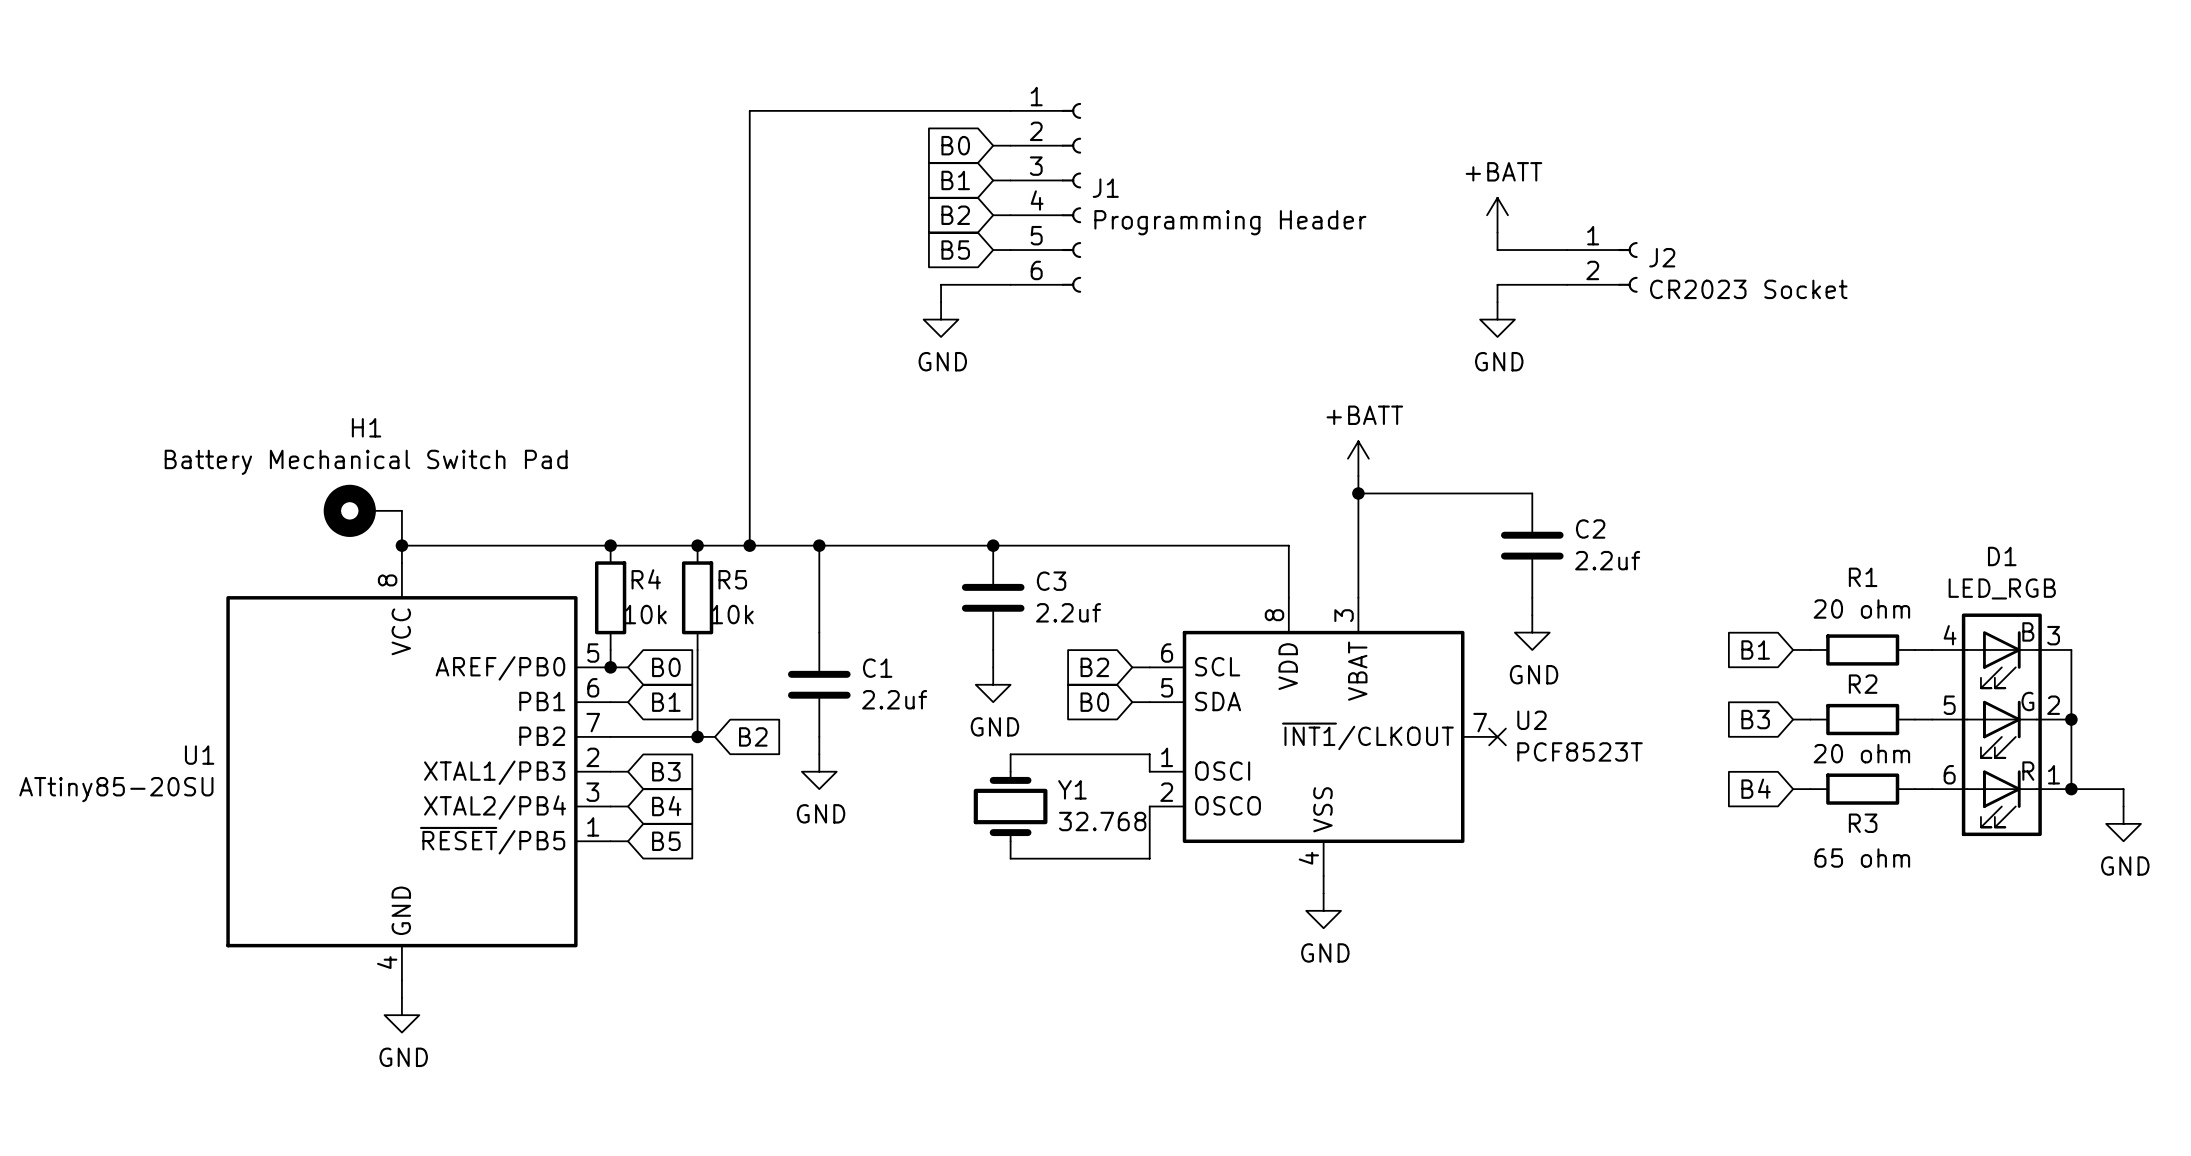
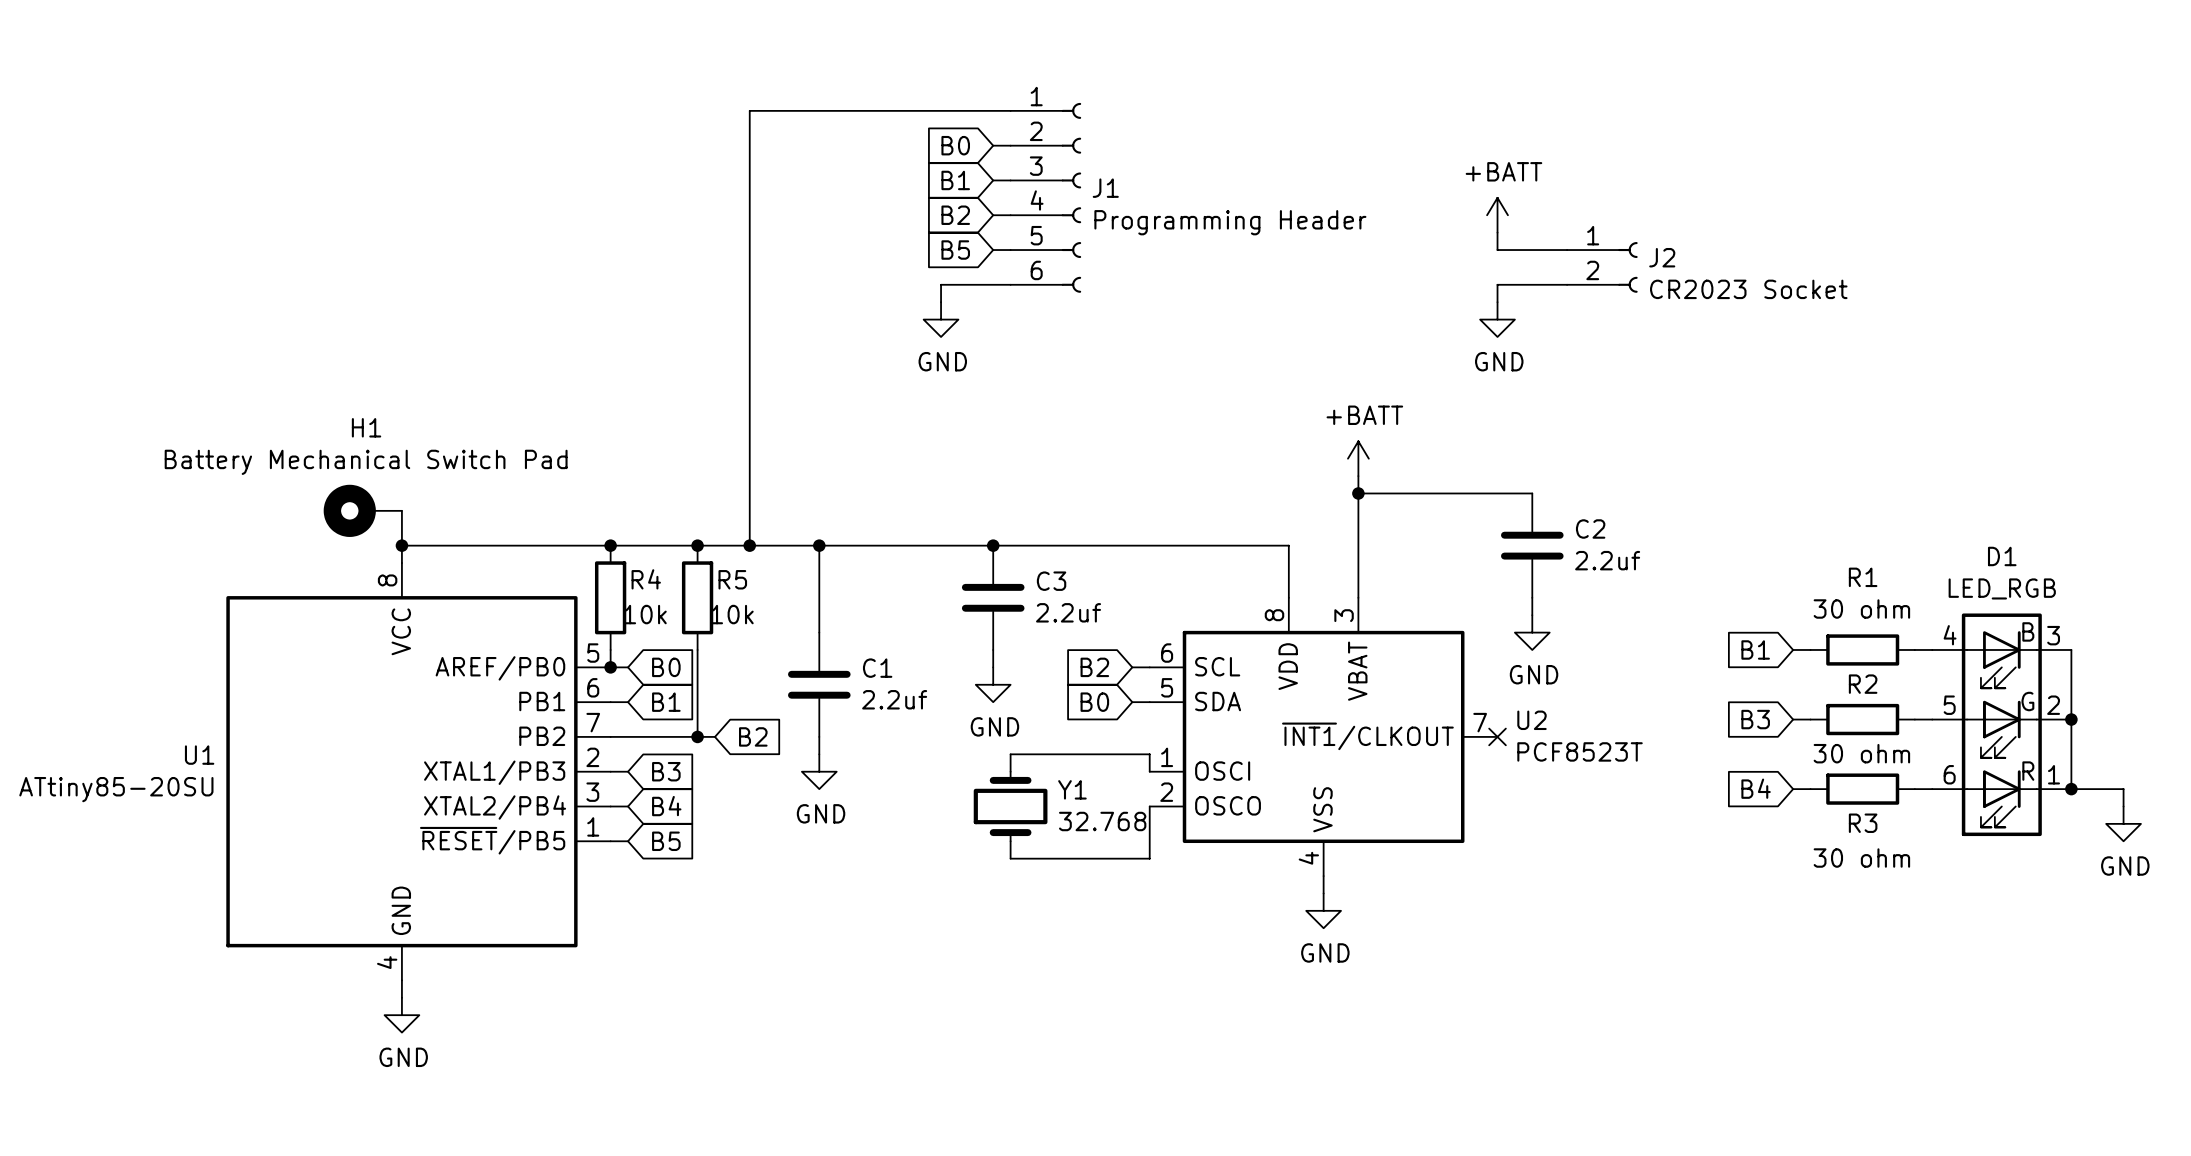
R1 value: 20 ohm (1861, 608) -> 30 ohm (1861, 608)
R2 value: 20 ohm (1861, 753) -> 30 ohm (1861, 753)
R3 value: 65 ohm (1862, 858) -> 30 ohm (1861, 858)

